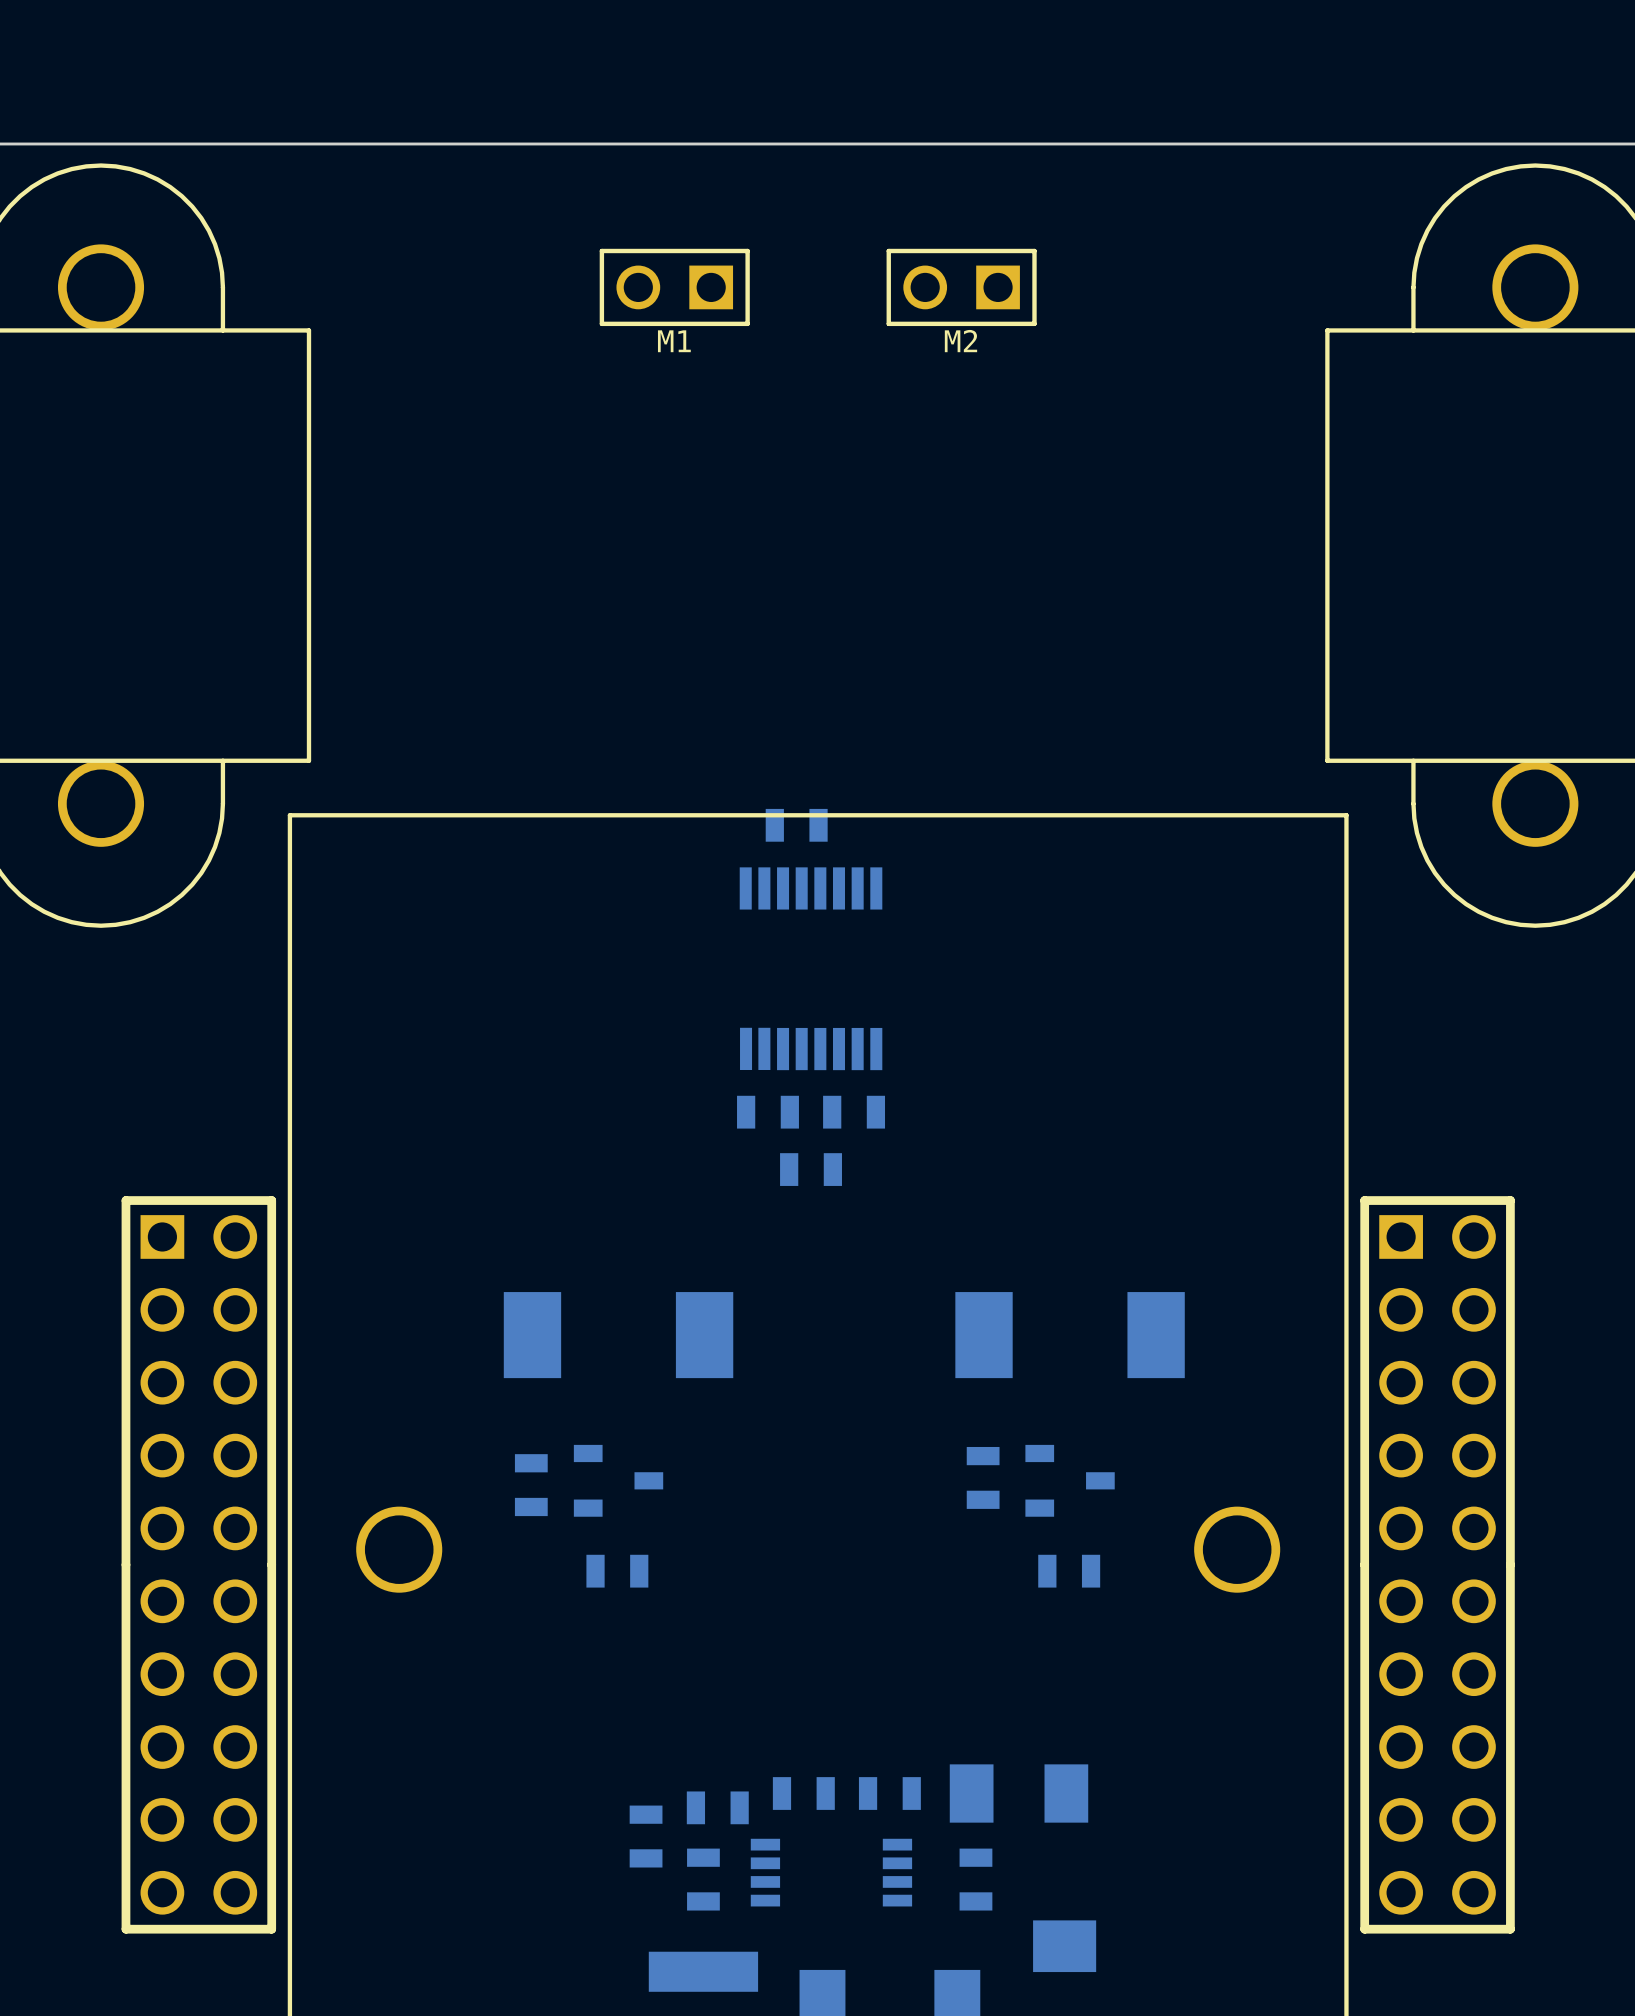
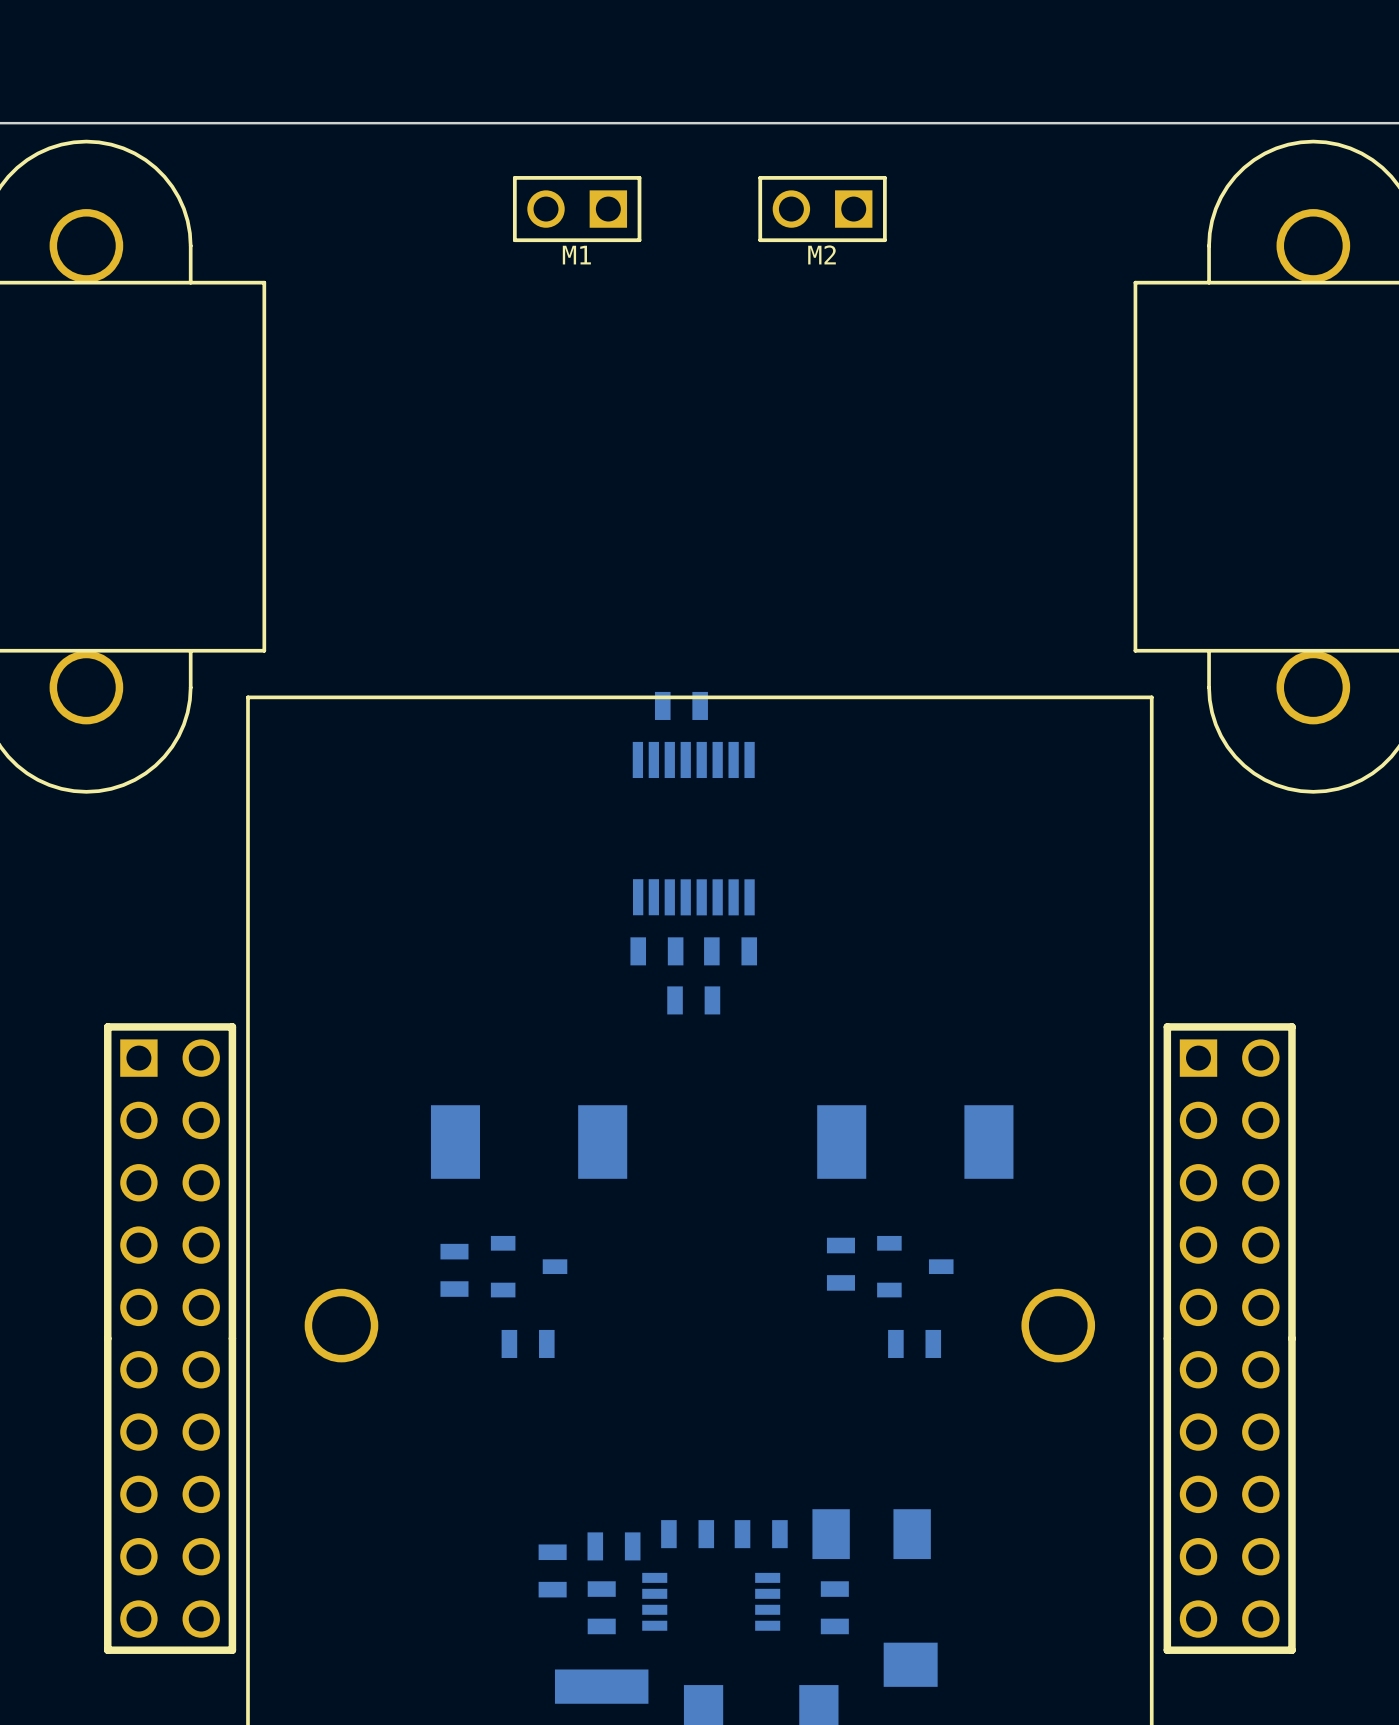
M1 position: (674, 287) -> (577, 209)
M2 position: (961, 287) -> (822, 209)

